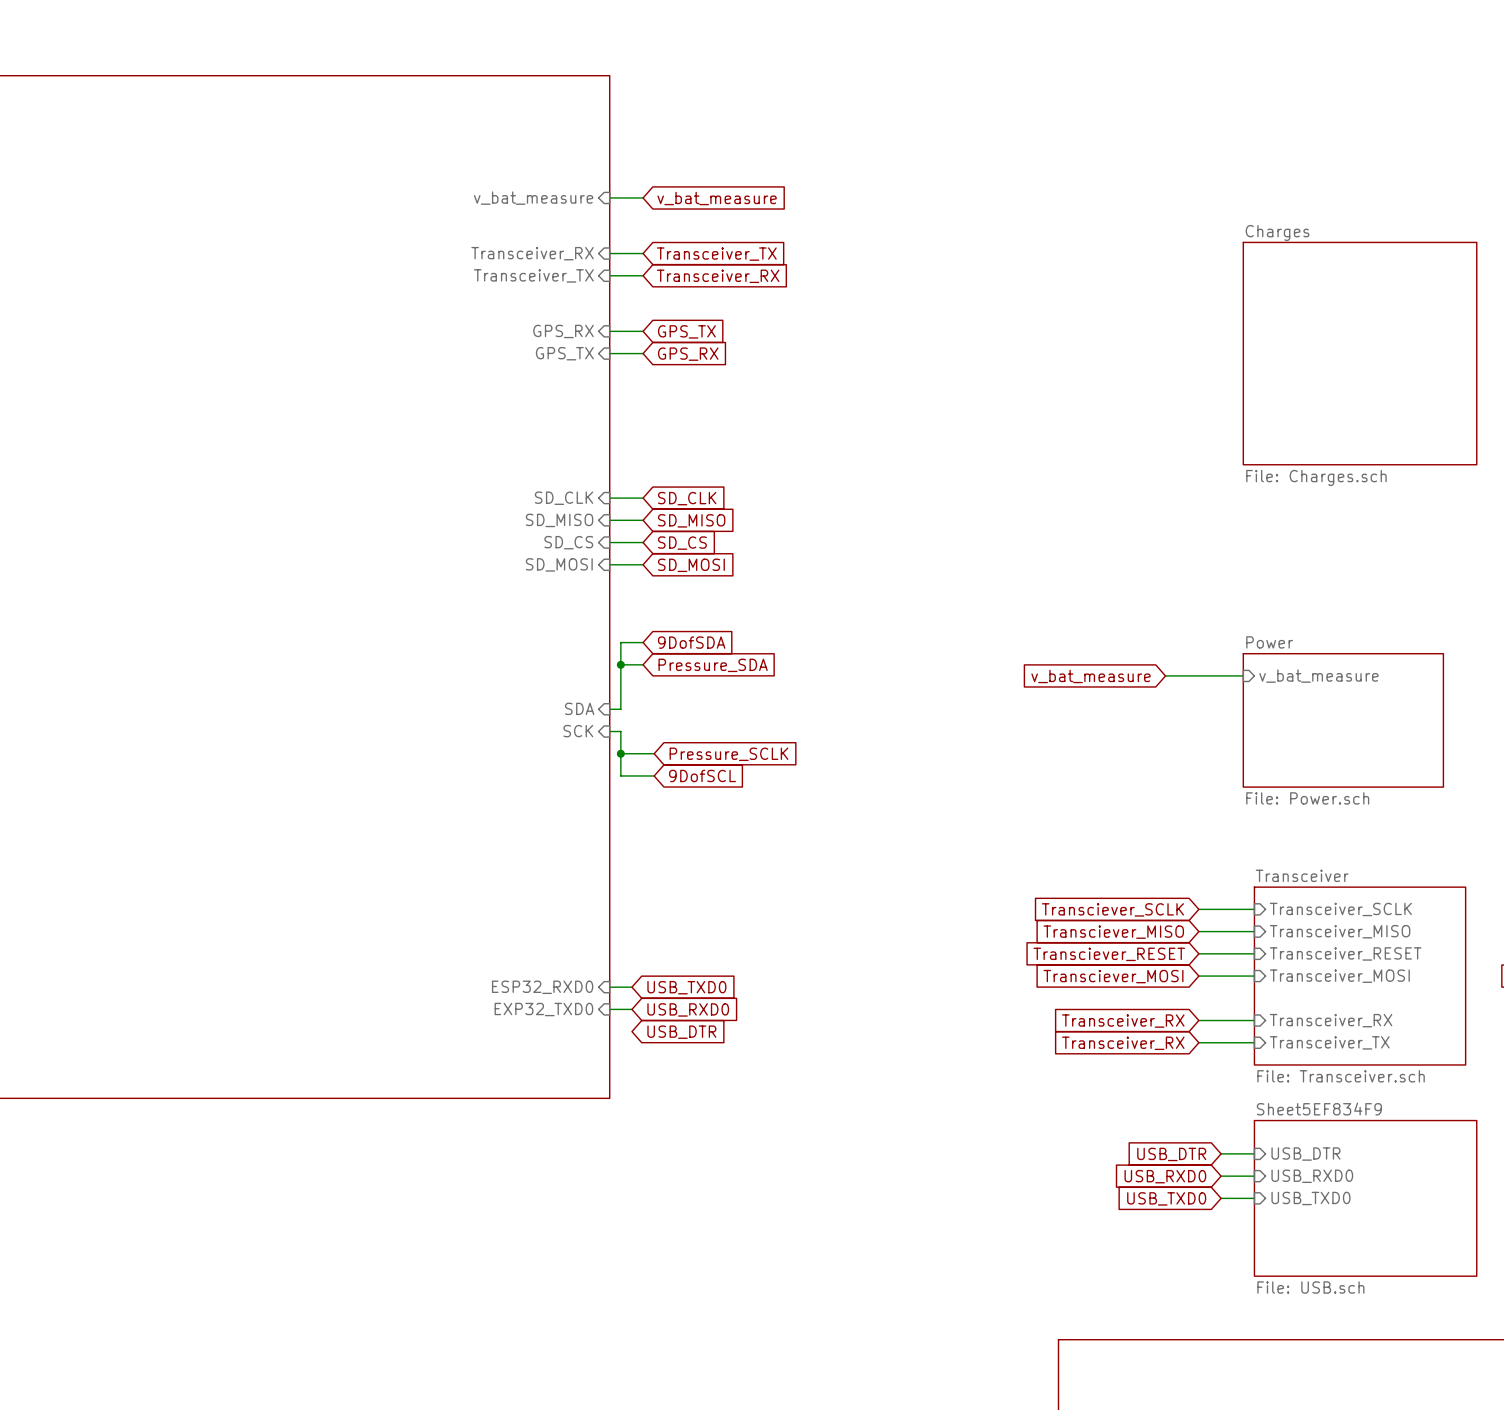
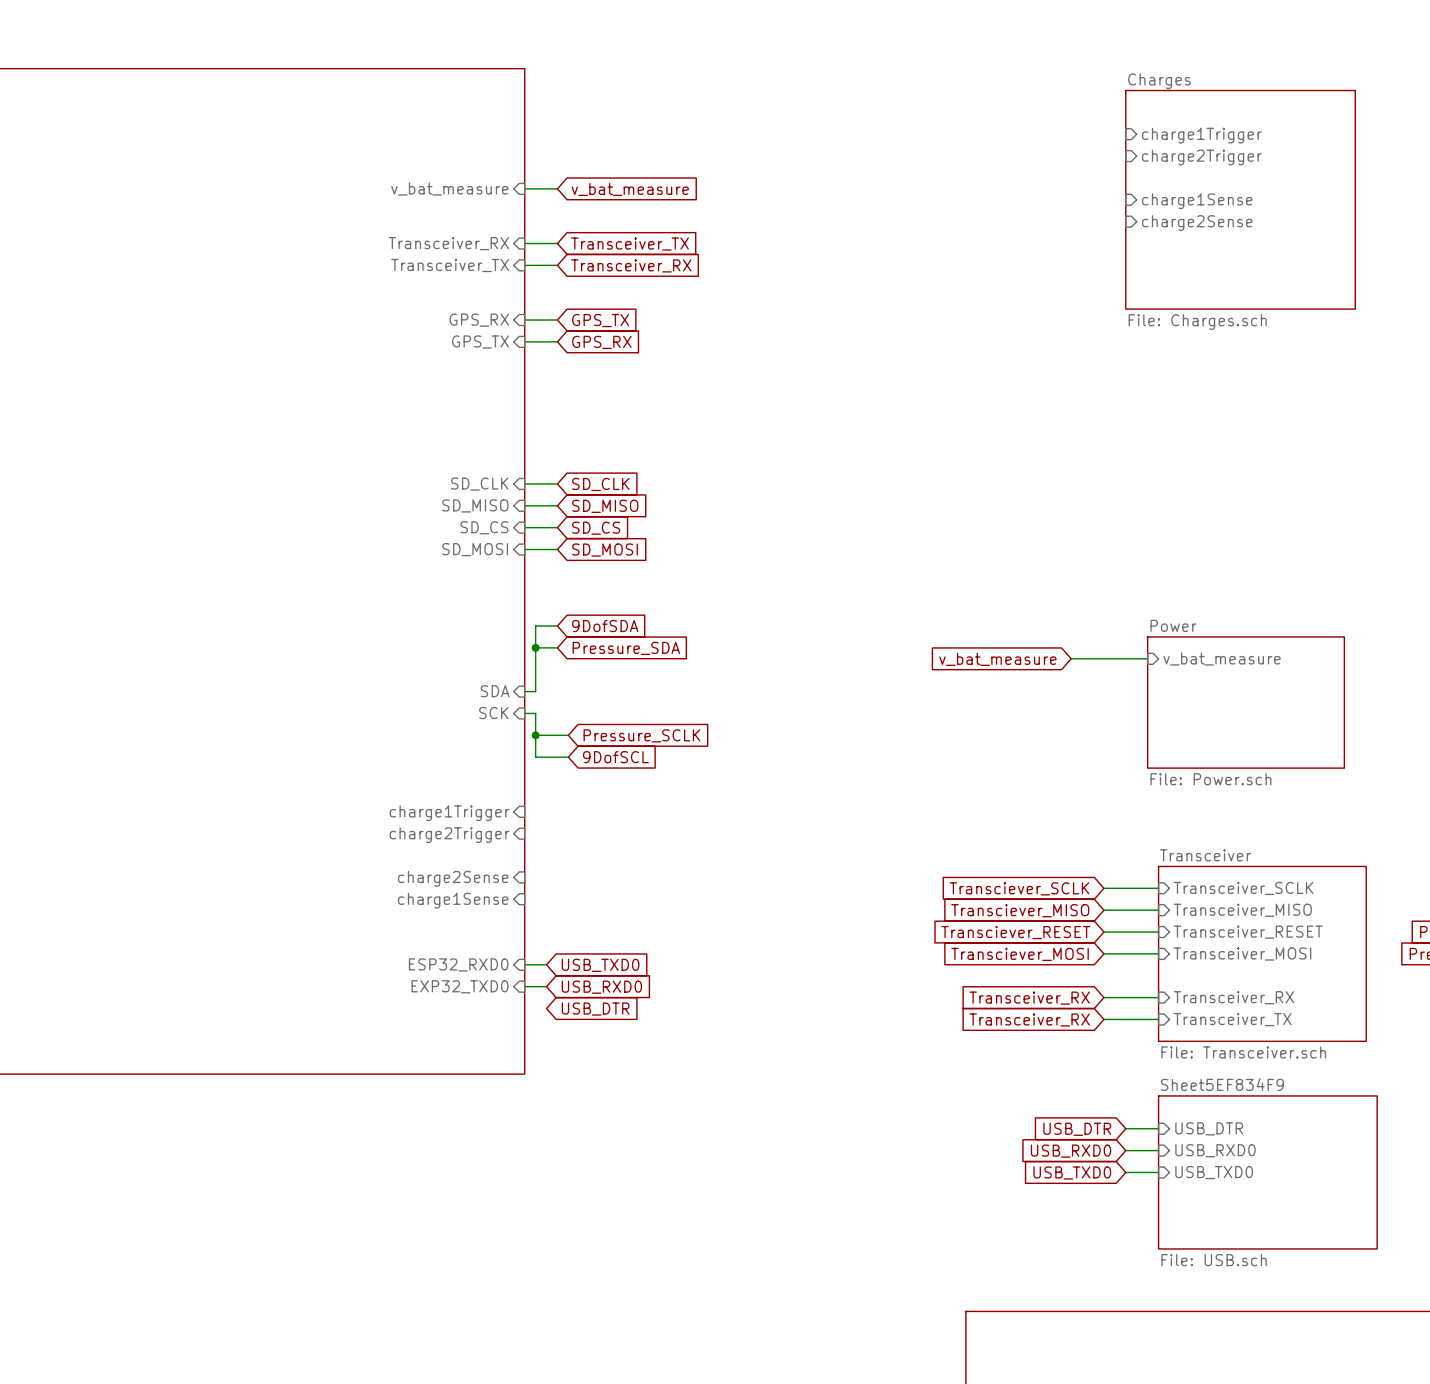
sheet pin: none -> charge1Trigger (1201, 135)
sheet pin: none -> charge2Trigger (1201, 157)
sheet pin: none -> charge1Sense (1197, 201)
sheet pin: none -> charge2Sense (1197, 223)
sheet Charges position: (1360, 353) -> (1240, 199)
sheet pin: none -> charge1Trigger (449, 813)
sheet pin: none -> charge2Trigger (449, 835)
sheet pin: none -> charge2Sense (453, 878)
sheet pin: none -> charge1Sense (453, 900)

